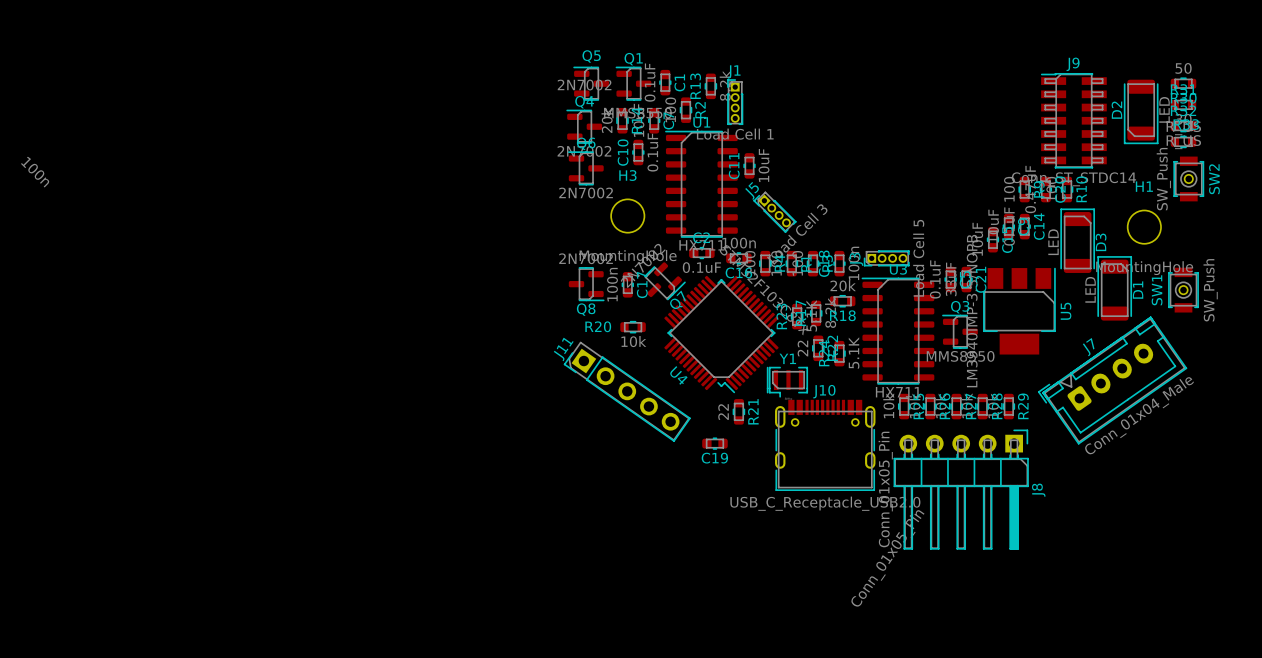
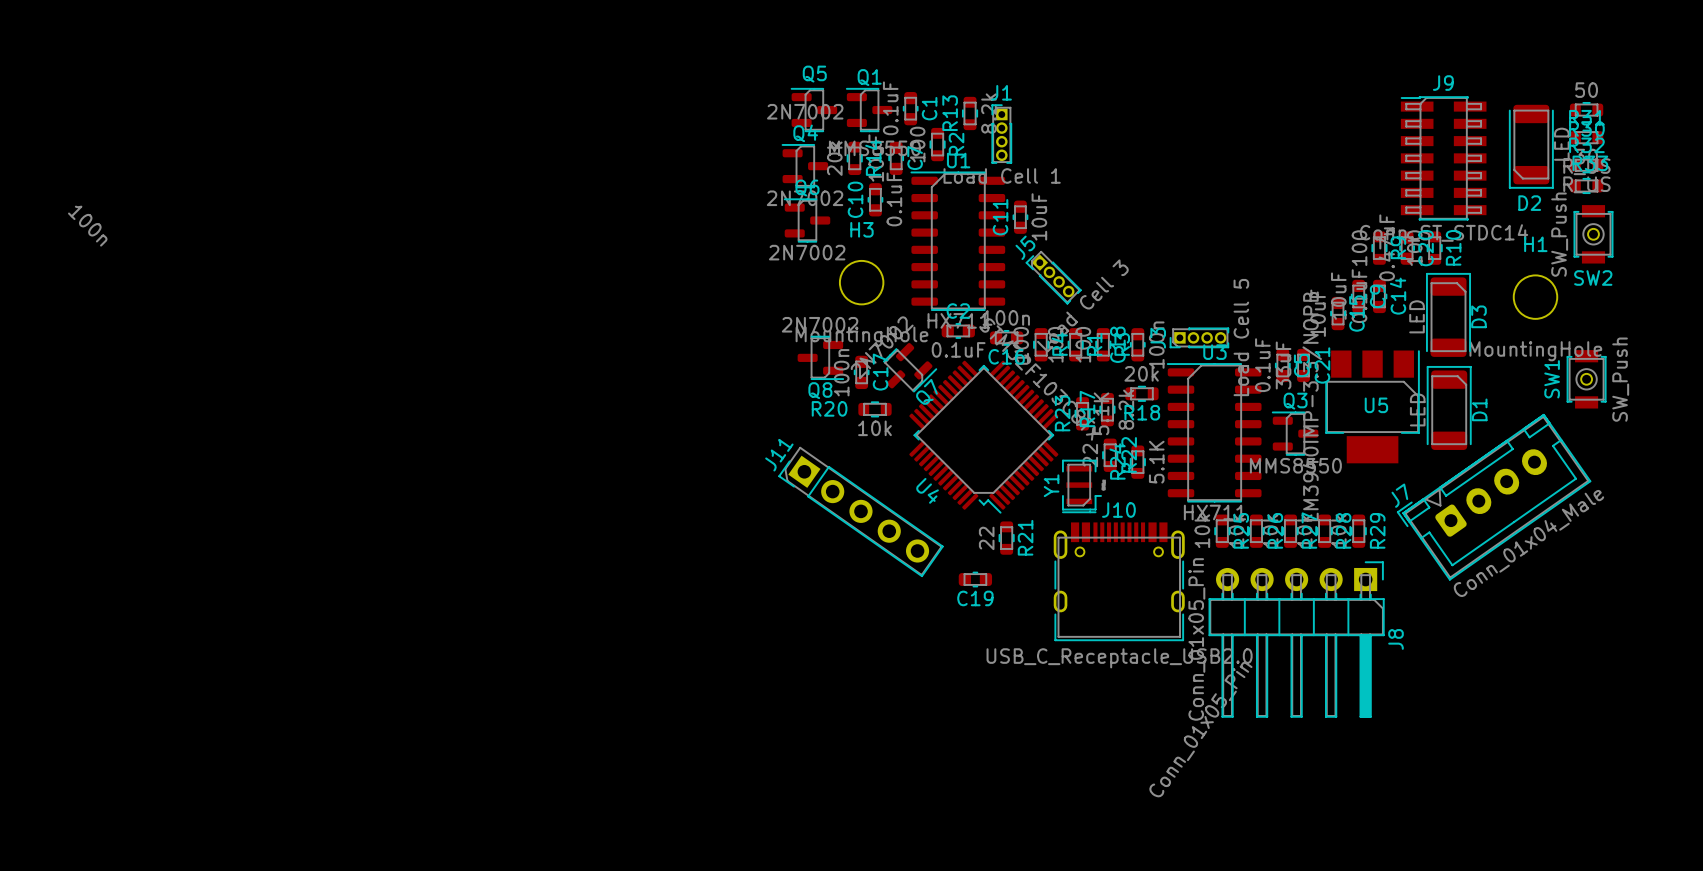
D2 name rotation: 0° (1116, 110) -> 90° clockwise (1529, 203)
D2 name position: D2 (1116, 110) -> D2 (1529, 203)
SW2 name rotation: 0° (1214, 179) -> 90° clockwise (1593, 278)
SW2 name position: SW2 (1214, 179) -> SW2 (1593, 278)
Q8 position: (586, 284) -> (820, 357)
D1 position: (1114, 288) -> (1449, 408)
U5 name rotation: 0° (1066, 311) -> 90° clockwise (1376, 405)
U5 name position: U5 (1066, 311) -> U5 (1376, 405)
R20 position: (633, 327) -> (874, 409)
J7 name position: J7 (1088, 347) -> J7 (1399, 495)
Y1 rotation: 0° (787, 382) -> 90° counterclockwise (1081, 486)

